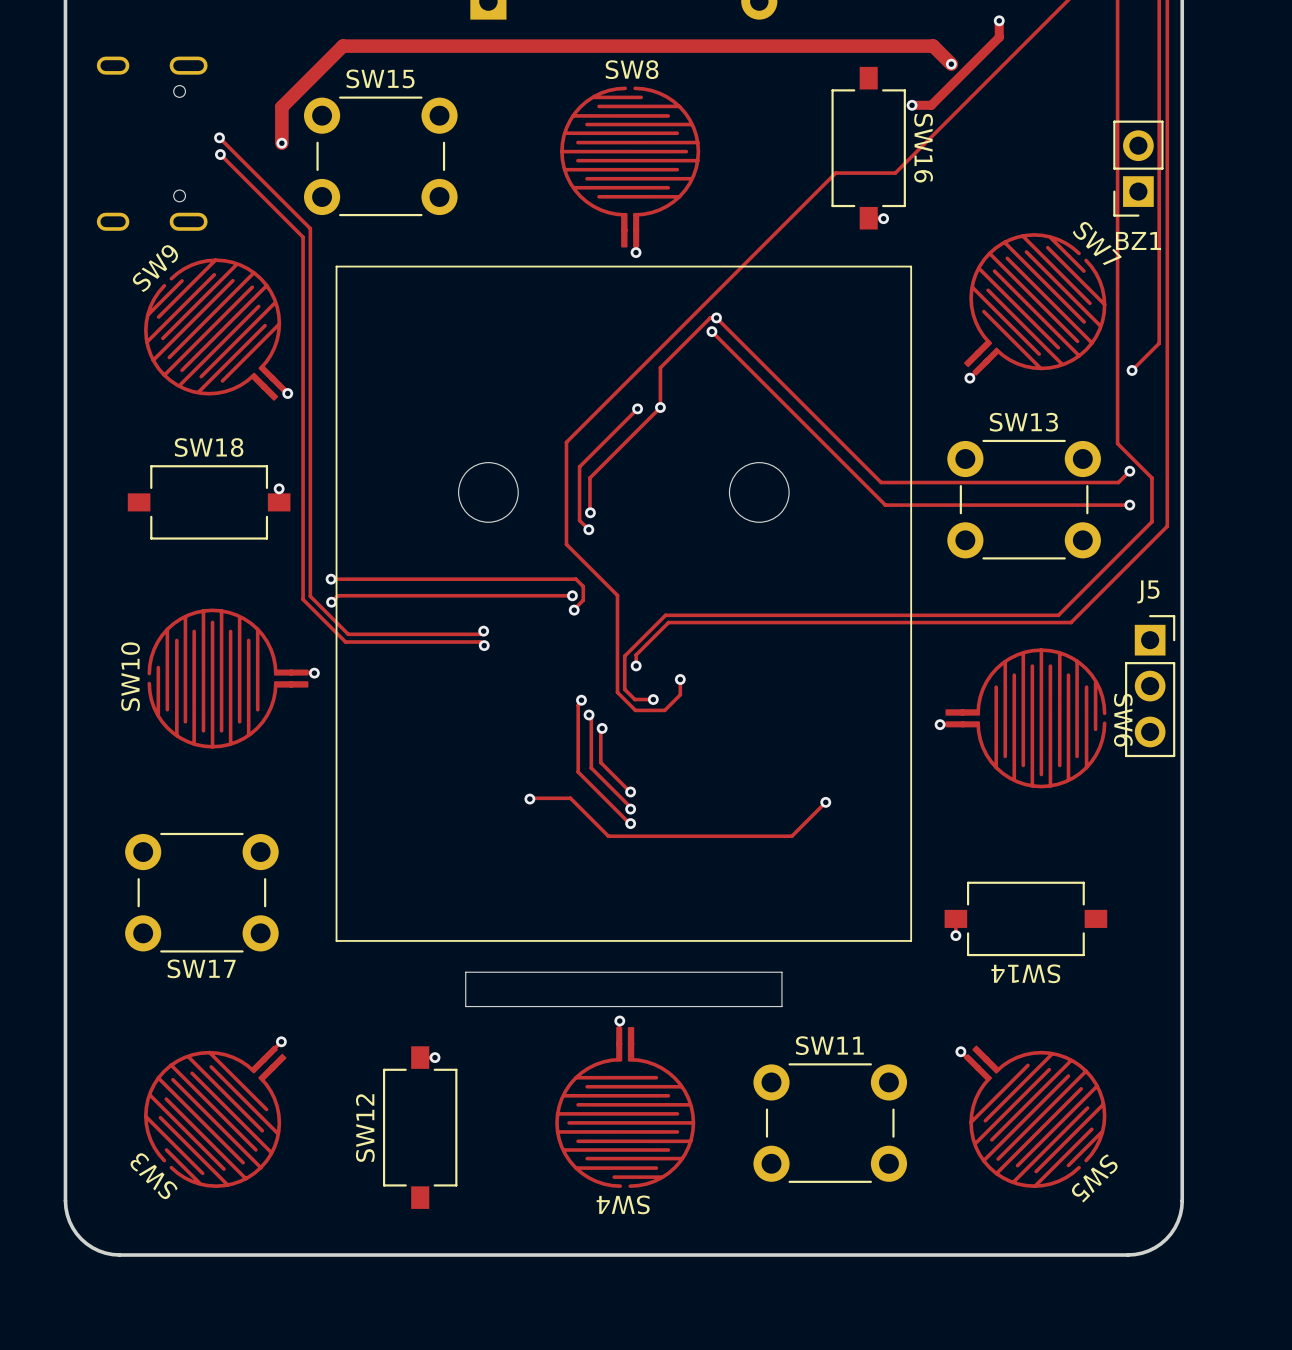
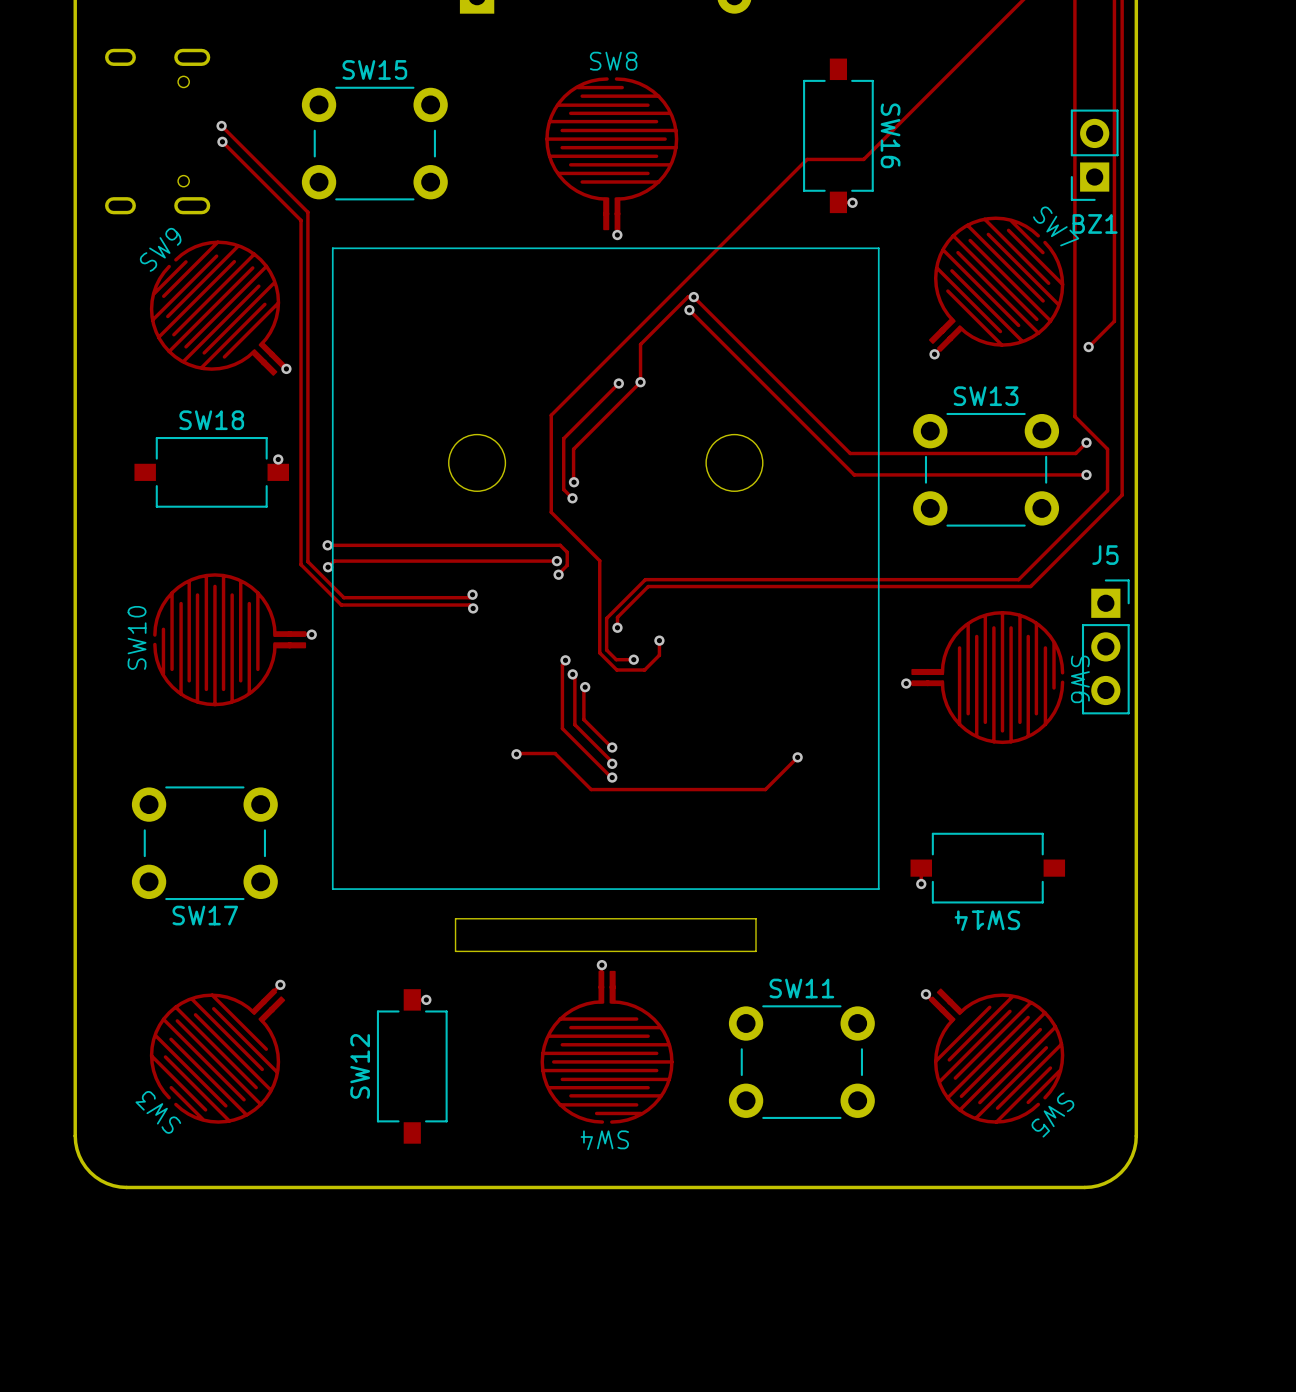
track: (999, 20) (999, 37) (931, 105) (912, 105) -> none
via: (999, 20) -> none
track: (951, 64) (933, 46) (342, 46) (281, 107) (281, 143) -> none
via: (951, 64) -> none
via: (912, 105) -> none
via: (281, 143) -> none

